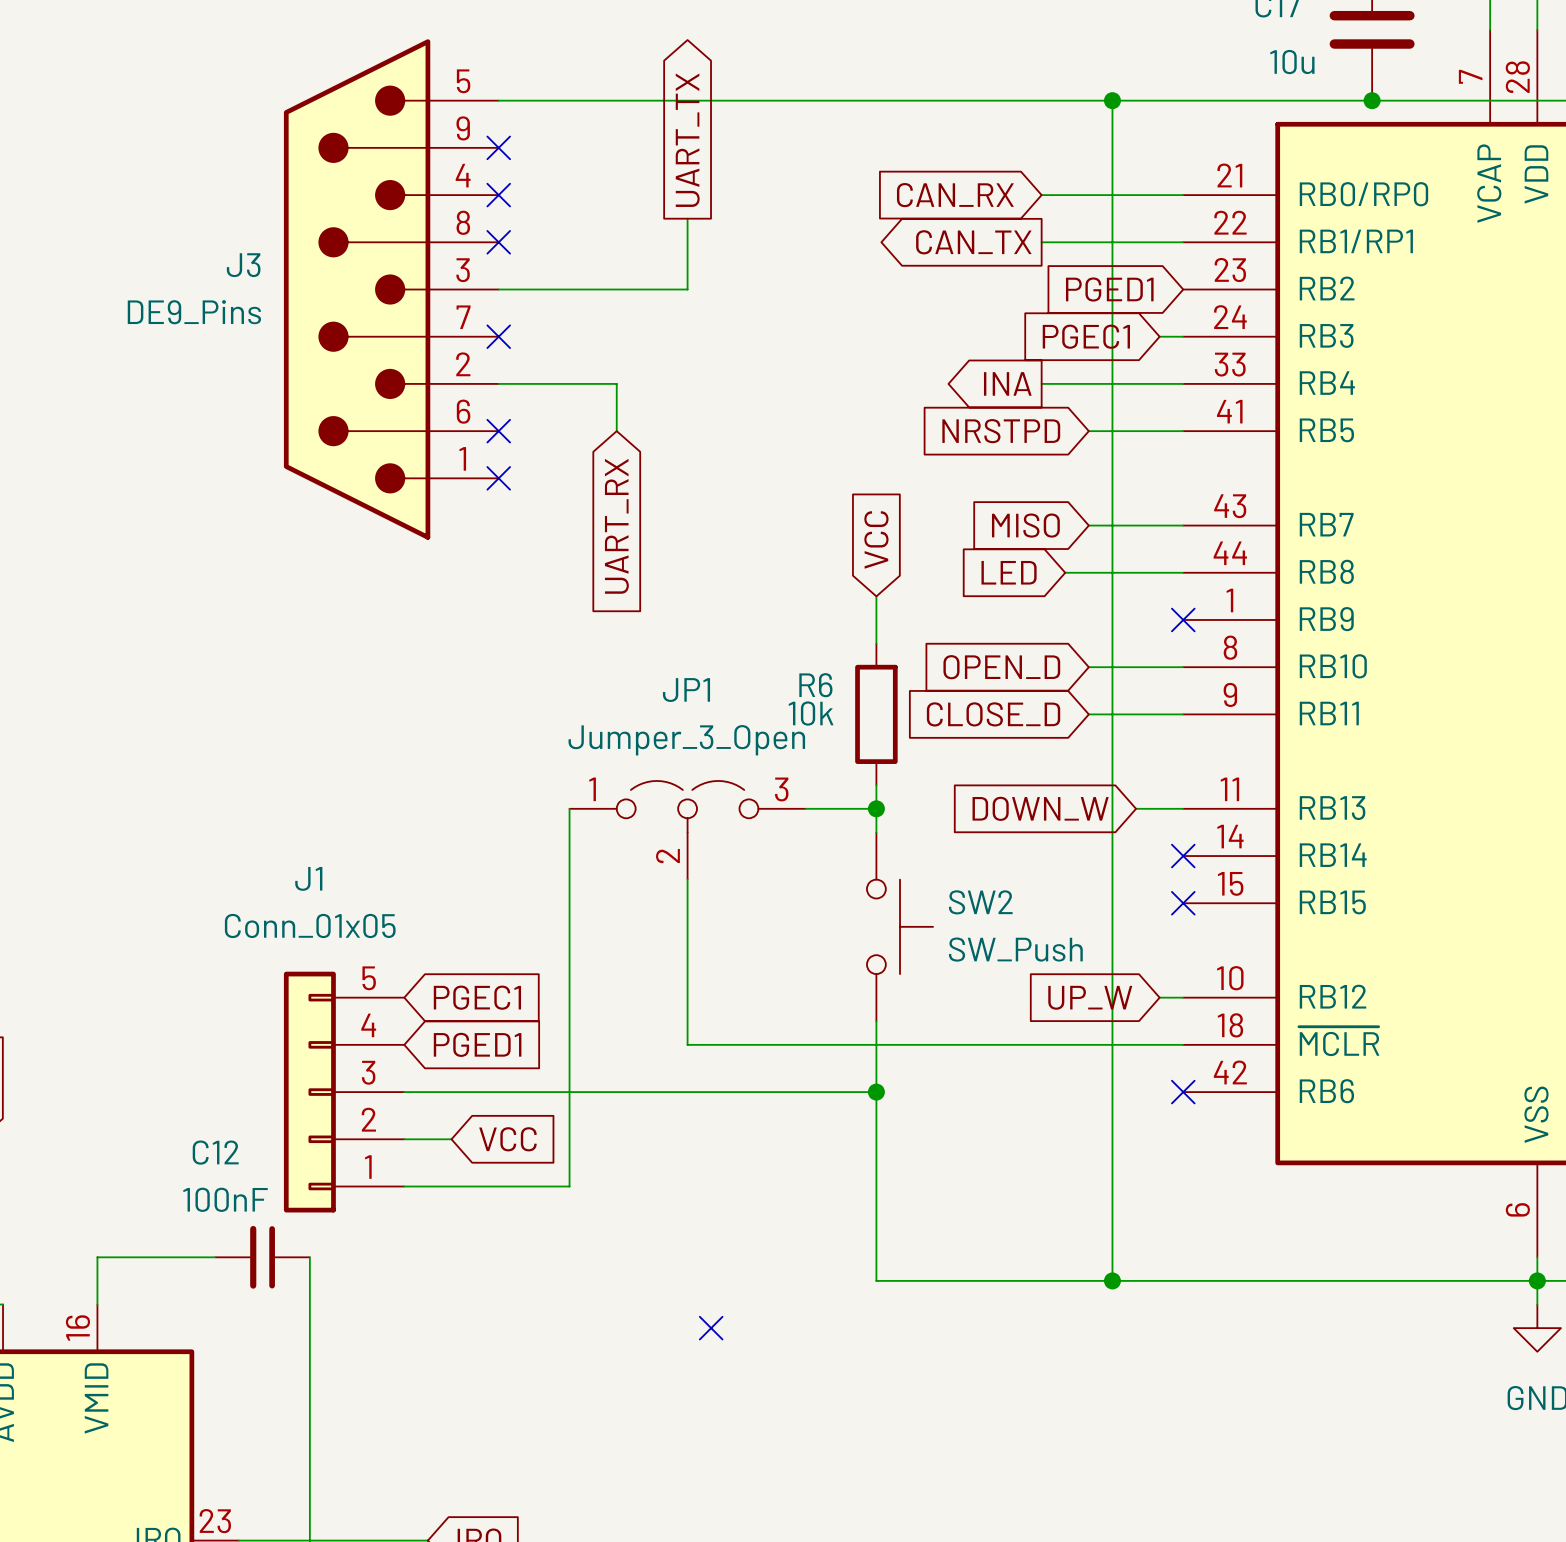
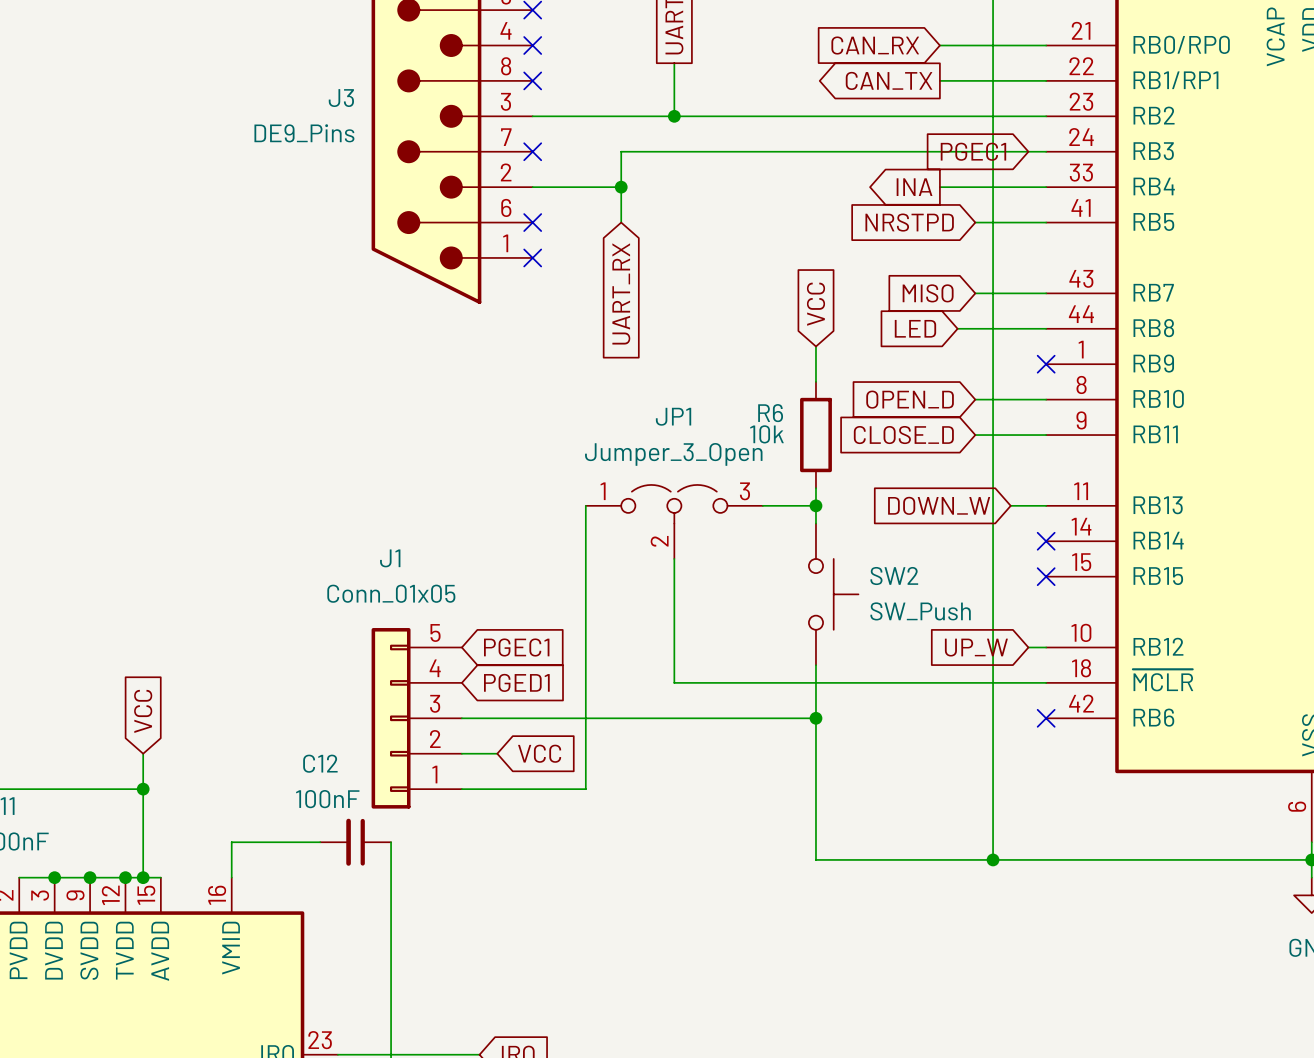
wire: none -> (674, 116) (1046, 116)
junction: none -> (674, 116)
global label: PGED1 (1109, 289) -> none
wire: none -> (1028, 151) (621, 151) (621, 187)
junction: none -> (621, 187)
no-connect mark: (711, 1328) -> none

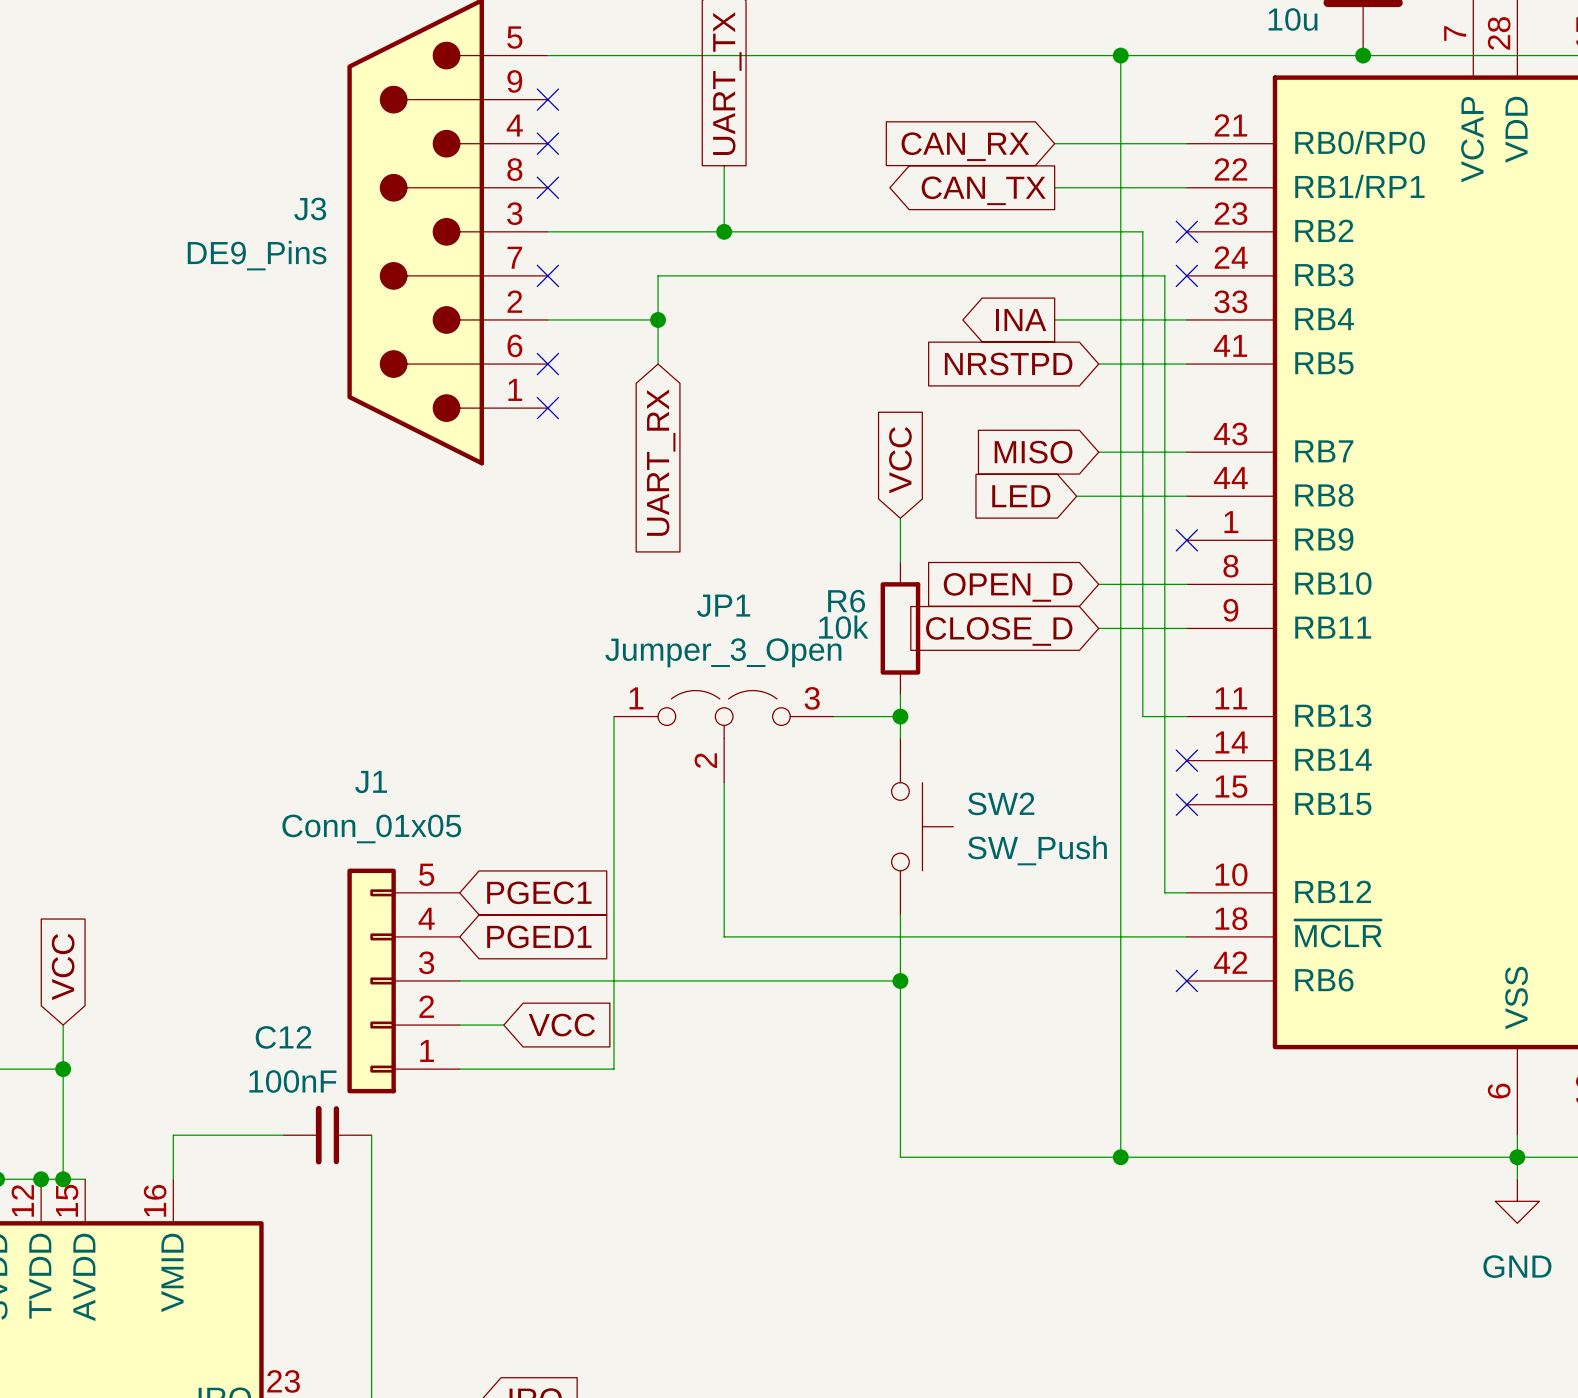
wire: (1010, 116) (1046, 116) -> (1142, 231) (1142, 716)
no-connect mark: none -> (1186, 231)
global label: PGEC1 (973, 151) -> none
wire: (1028, 151) (1046, 151) -> (1164, 275) (1164, 892)
no-connect mark: none -> (1186, 275)
global label: DOWN_W (939, 505) -> none
global label: UP_W (976, 647) -> none

